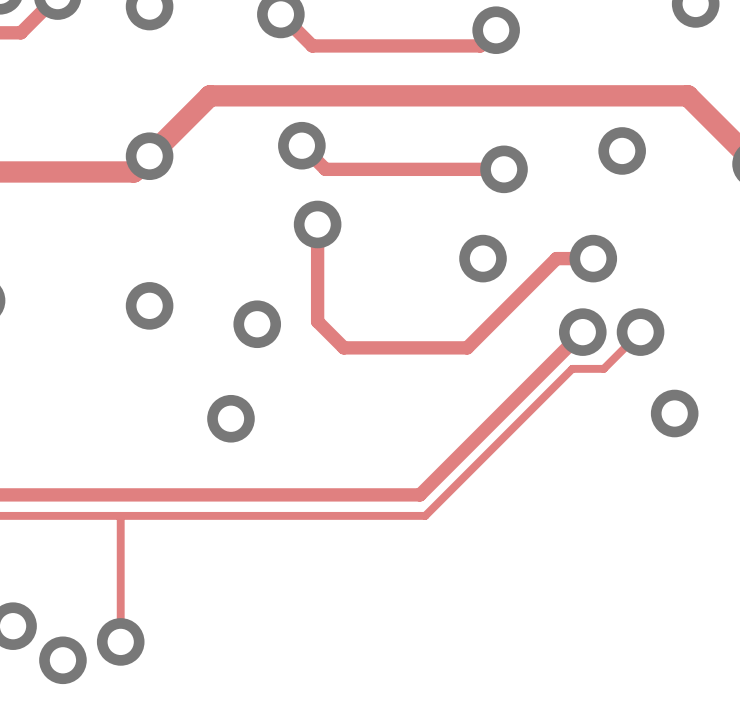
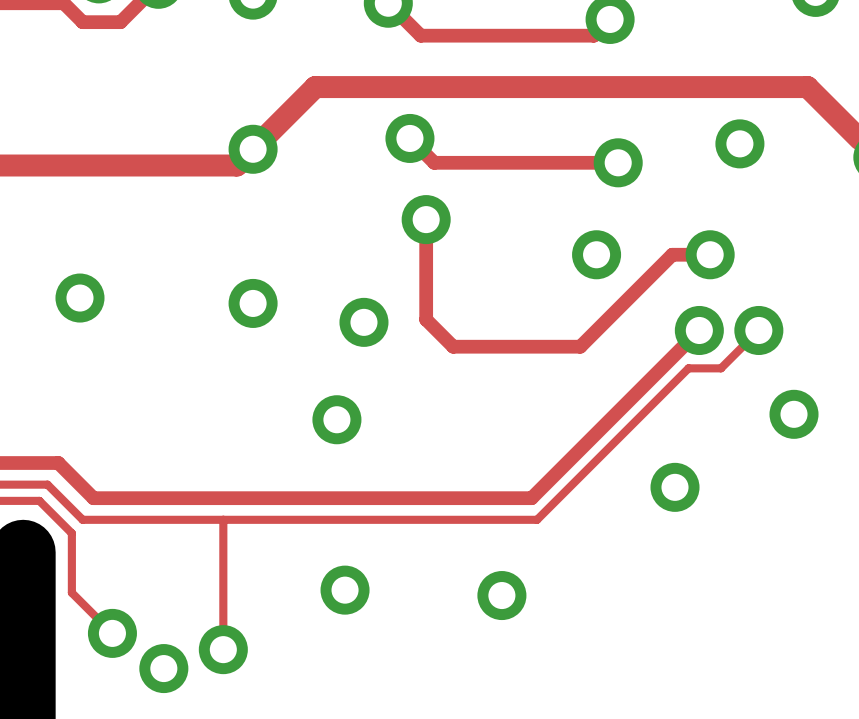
via: none -> (675, 487)
via: none -> (345, 590)
via: none -> (501, 595)

